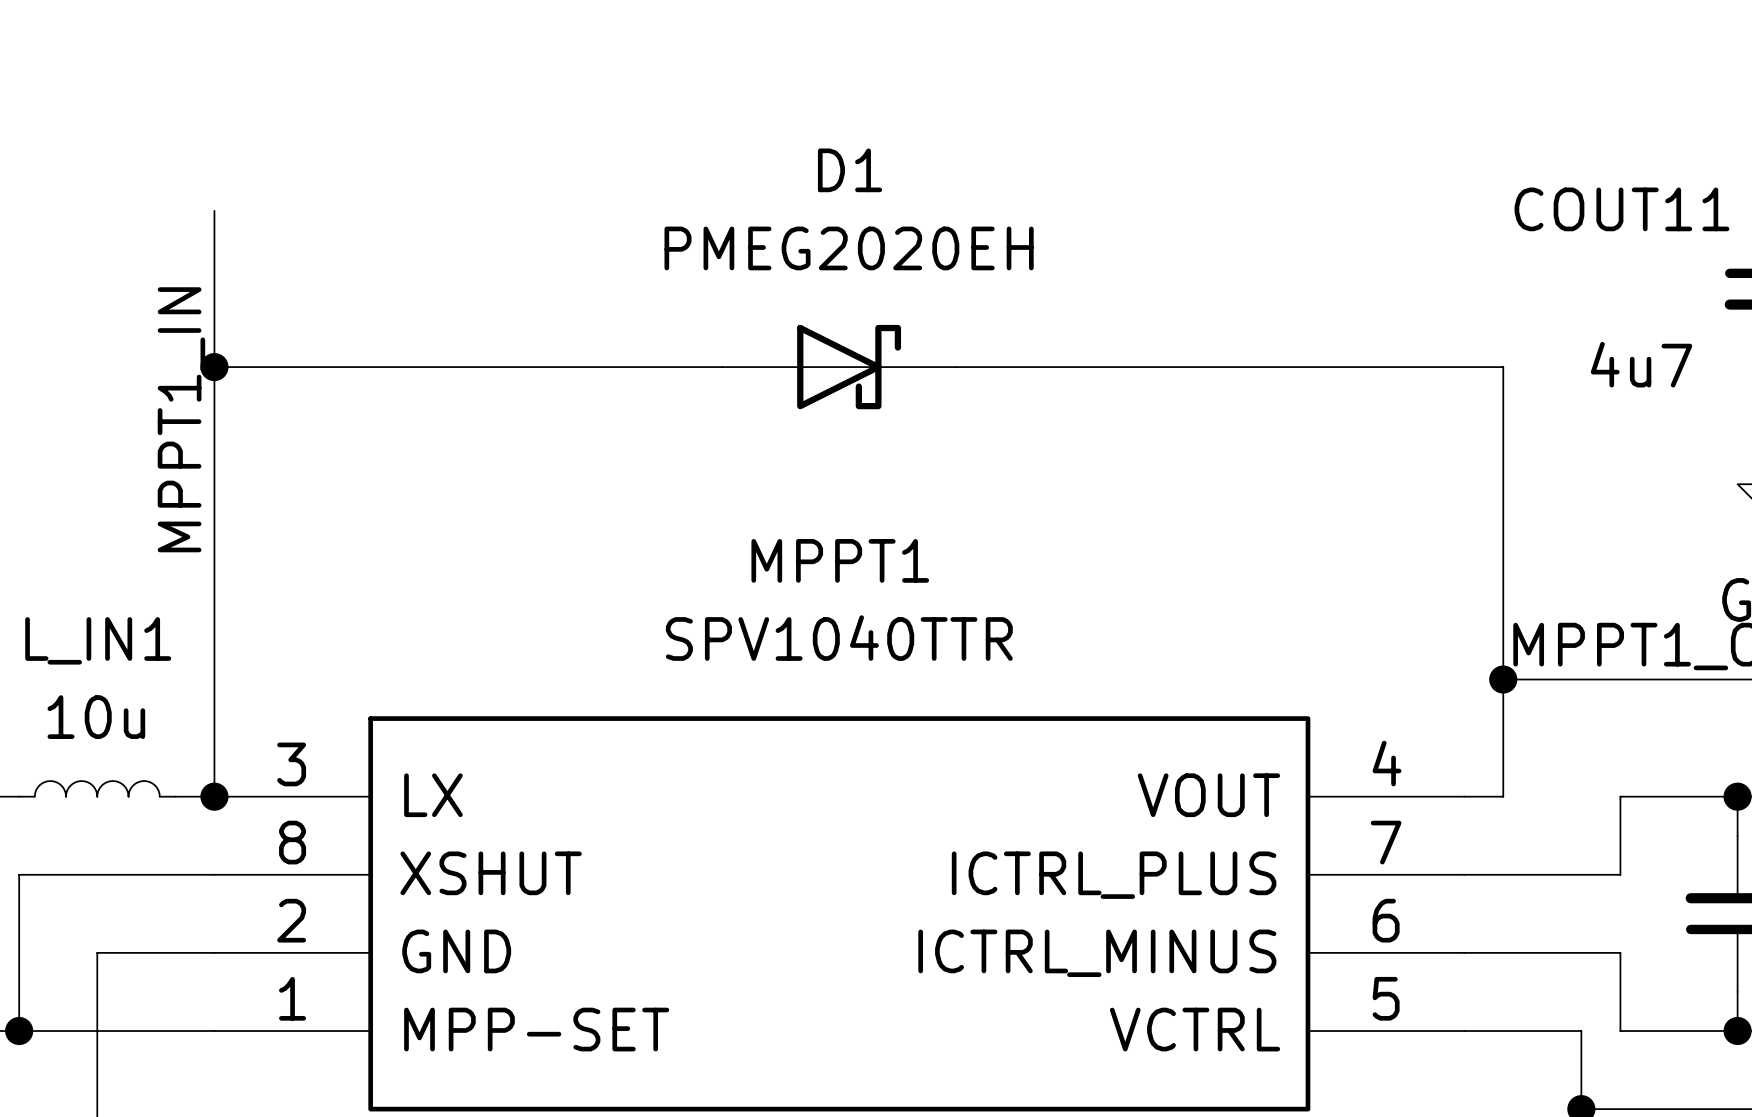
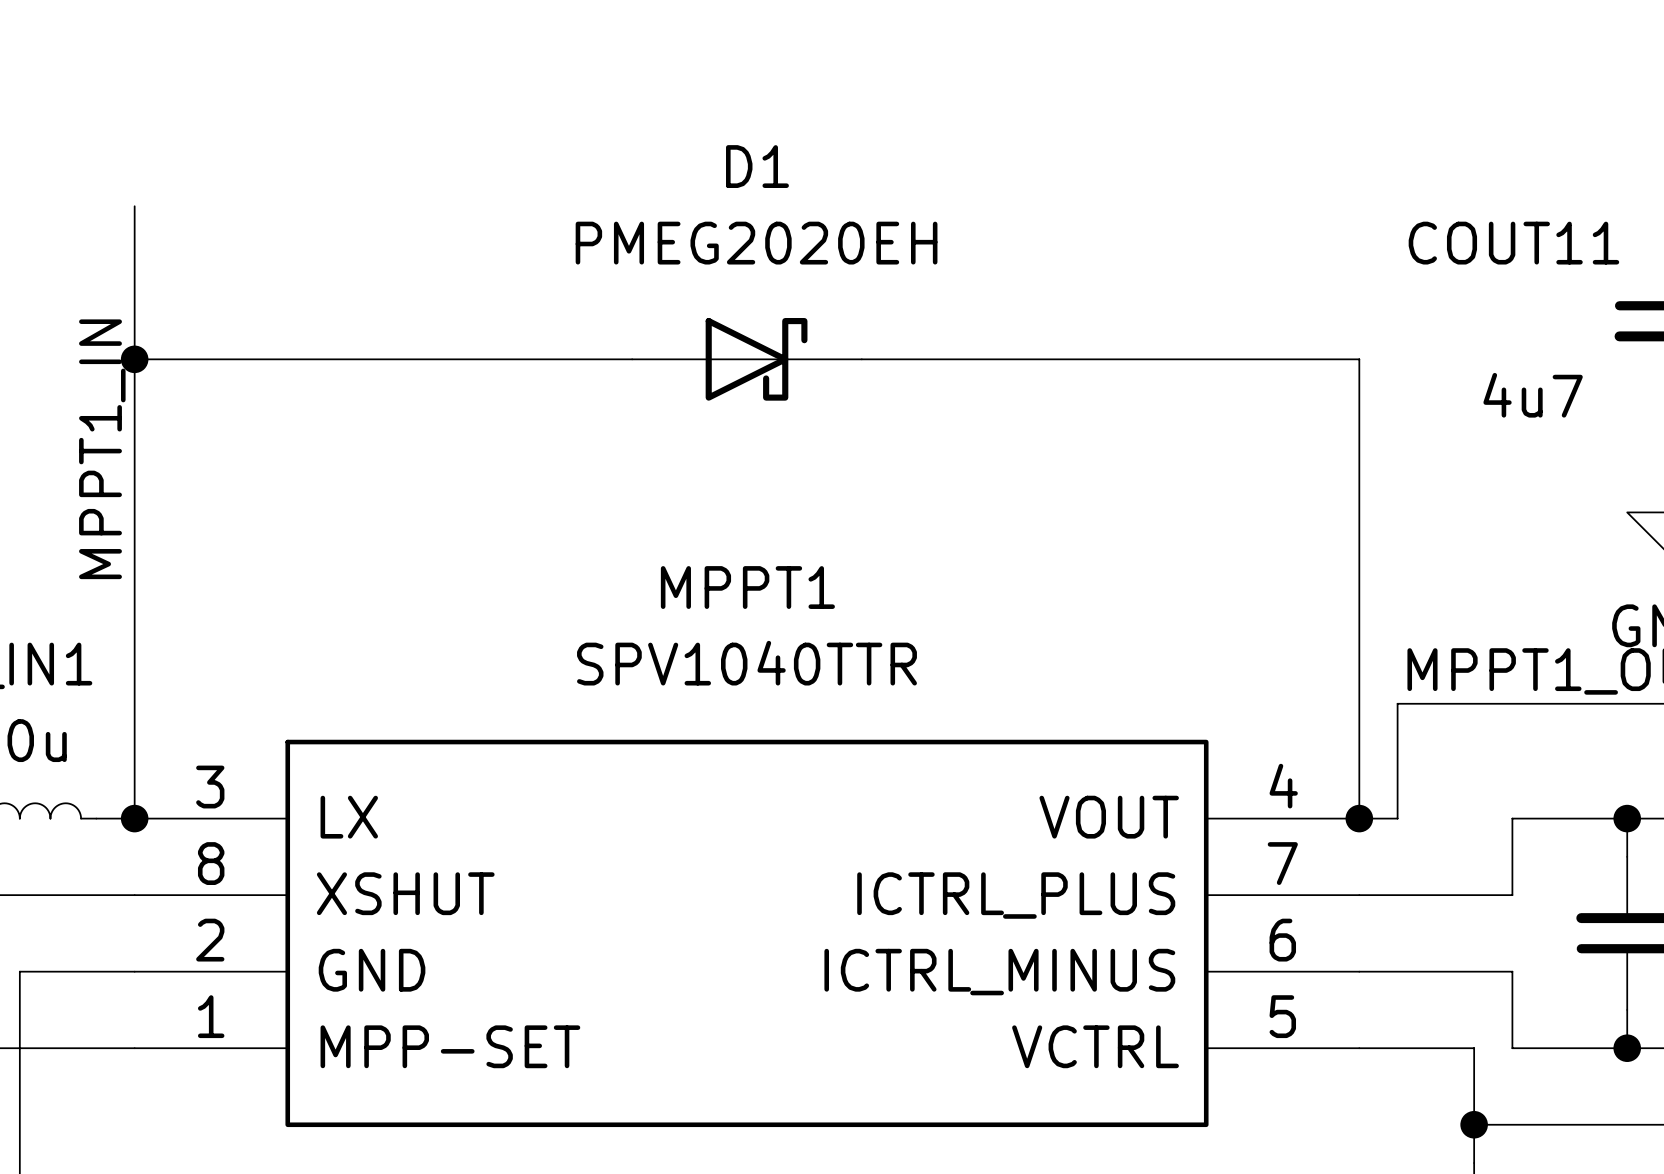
wire: none -> (134, 206) (134, 244)
wire: none -> (861, 359) (1359, 359) (1359, 818)
wire: (214, 367) (722, 367) -> (134, 359) (632, 359)
junction position: (214, 367) -> (134, 359)
D1 position: (839, 367) -> (746, 359)
wire: (956, 367) (1503, 367) (1503, 679) -> none
junction position: (1503, 679) -> (1359, 818)

